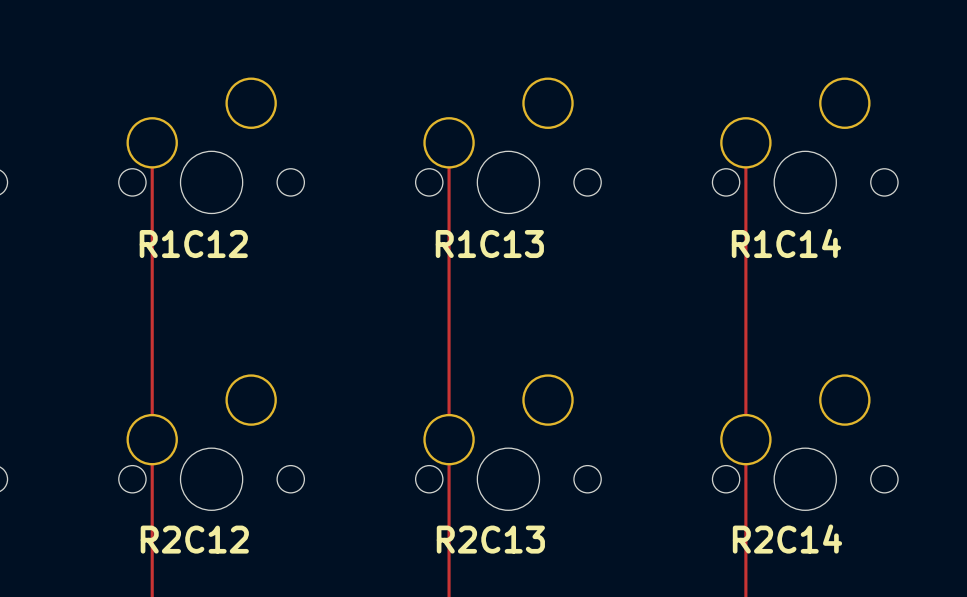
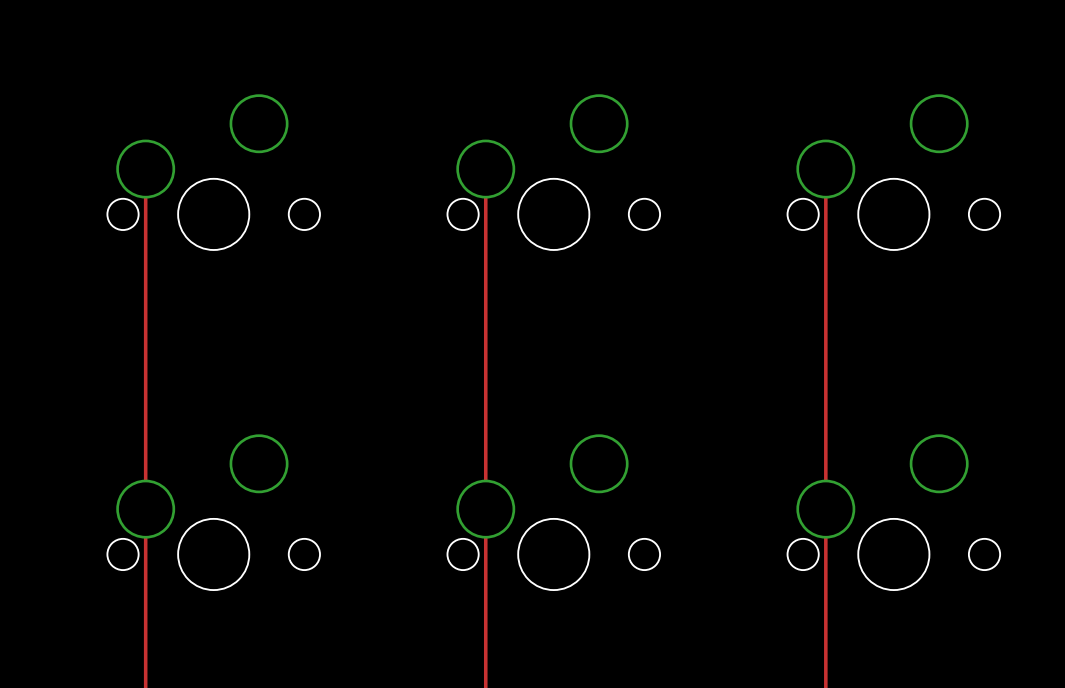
text: R1C14 (786, 243) -> none
text: R1C12 (193, 244) -> none
text: R1C13 (489, 244) -> none
text: R2C12 (194, 539) -> none
text: R2C13 (490, 539) -> none
text: R2C14 (787, 539) -> none

